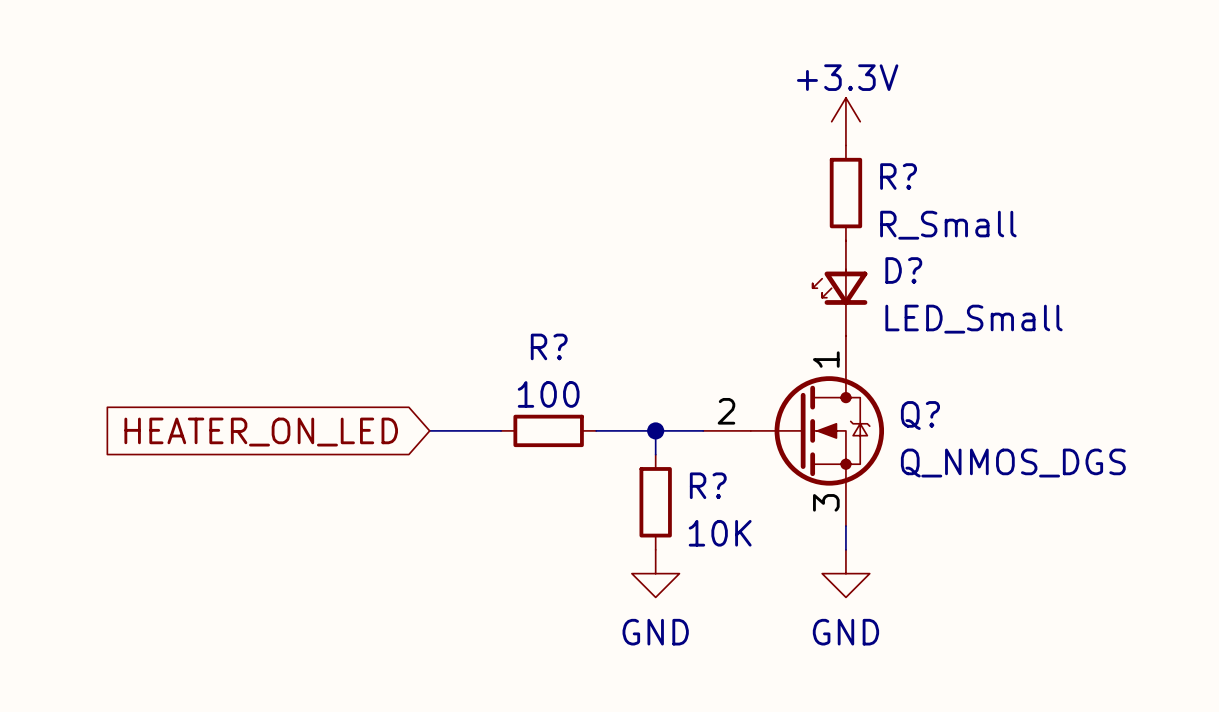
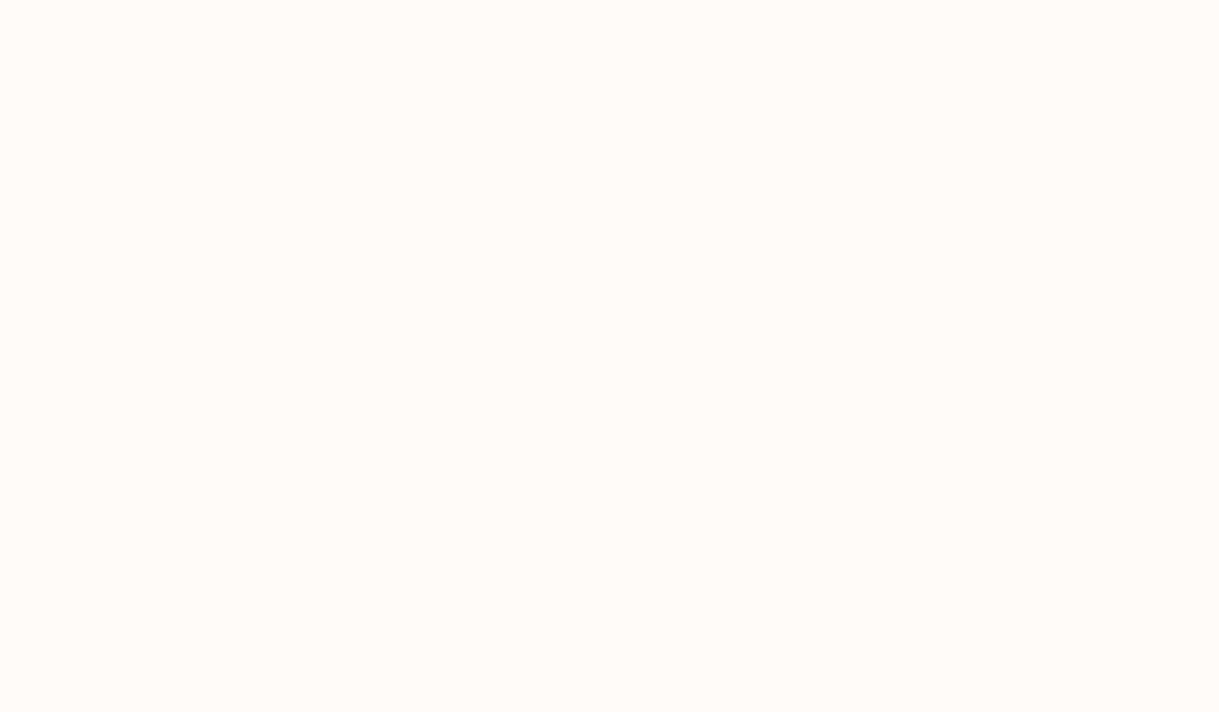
power symbol: +3.3V (845, 121) -> none
R?: R_Small (845, 193) -> none
D?: LED_Small (840, 288) -> none
wire: (429, 430) (501, 430) -> none
R?: 100 (548, 430) -> none
wire: (596, 430) (703, 430) -> none
wire: (655, 430) (655, 454) -> none
junction: (655, 430) -> none
Q?: Q_NMOS_DGS (793, 430) -> none
global label: HEATER_ON_LED (261, 432) -> none
R?: 10K (655, 502) -> none
wire: (845, 526) (845, 549) -> none
power symbol: GND (655, 573) -> none
power symbol: GND (845, 573) -> none

